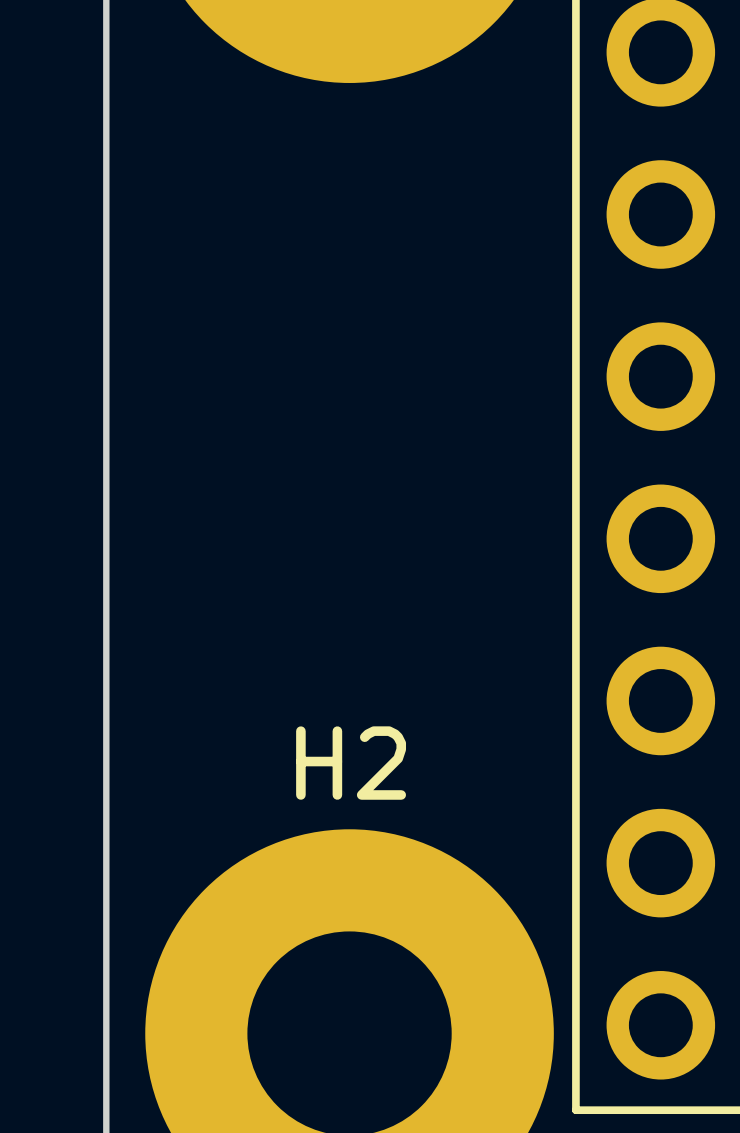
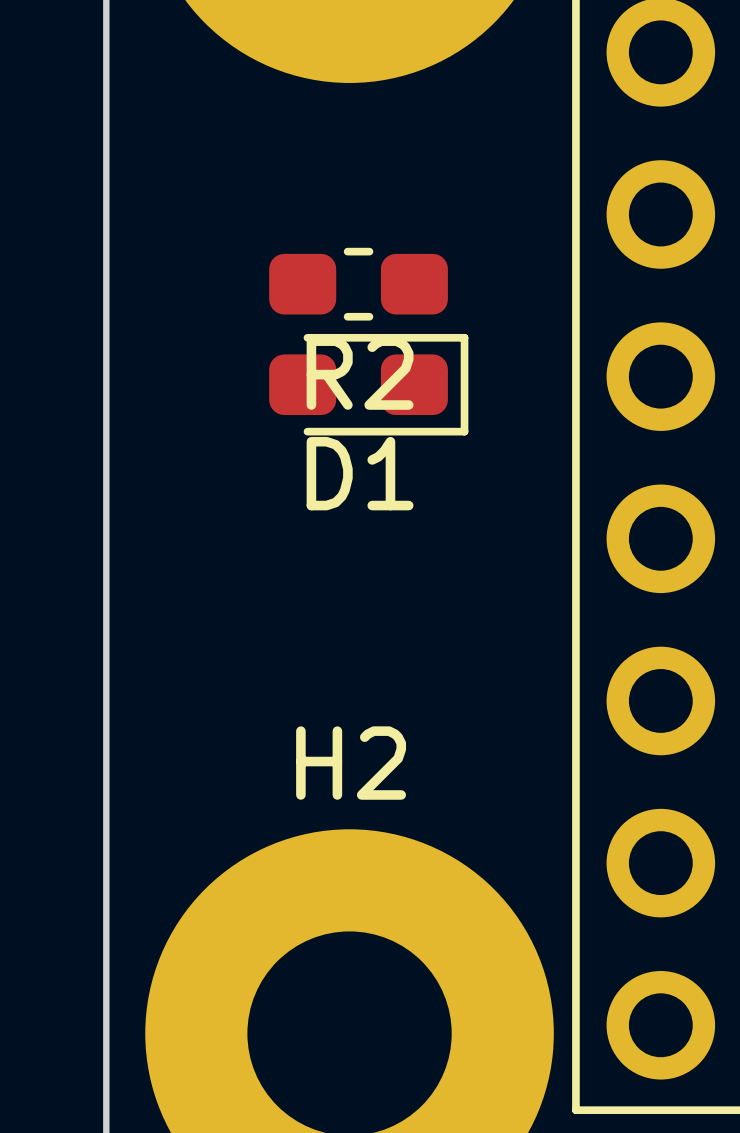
R2: none -> (358, 284)
D1: none -> (368, 384)

